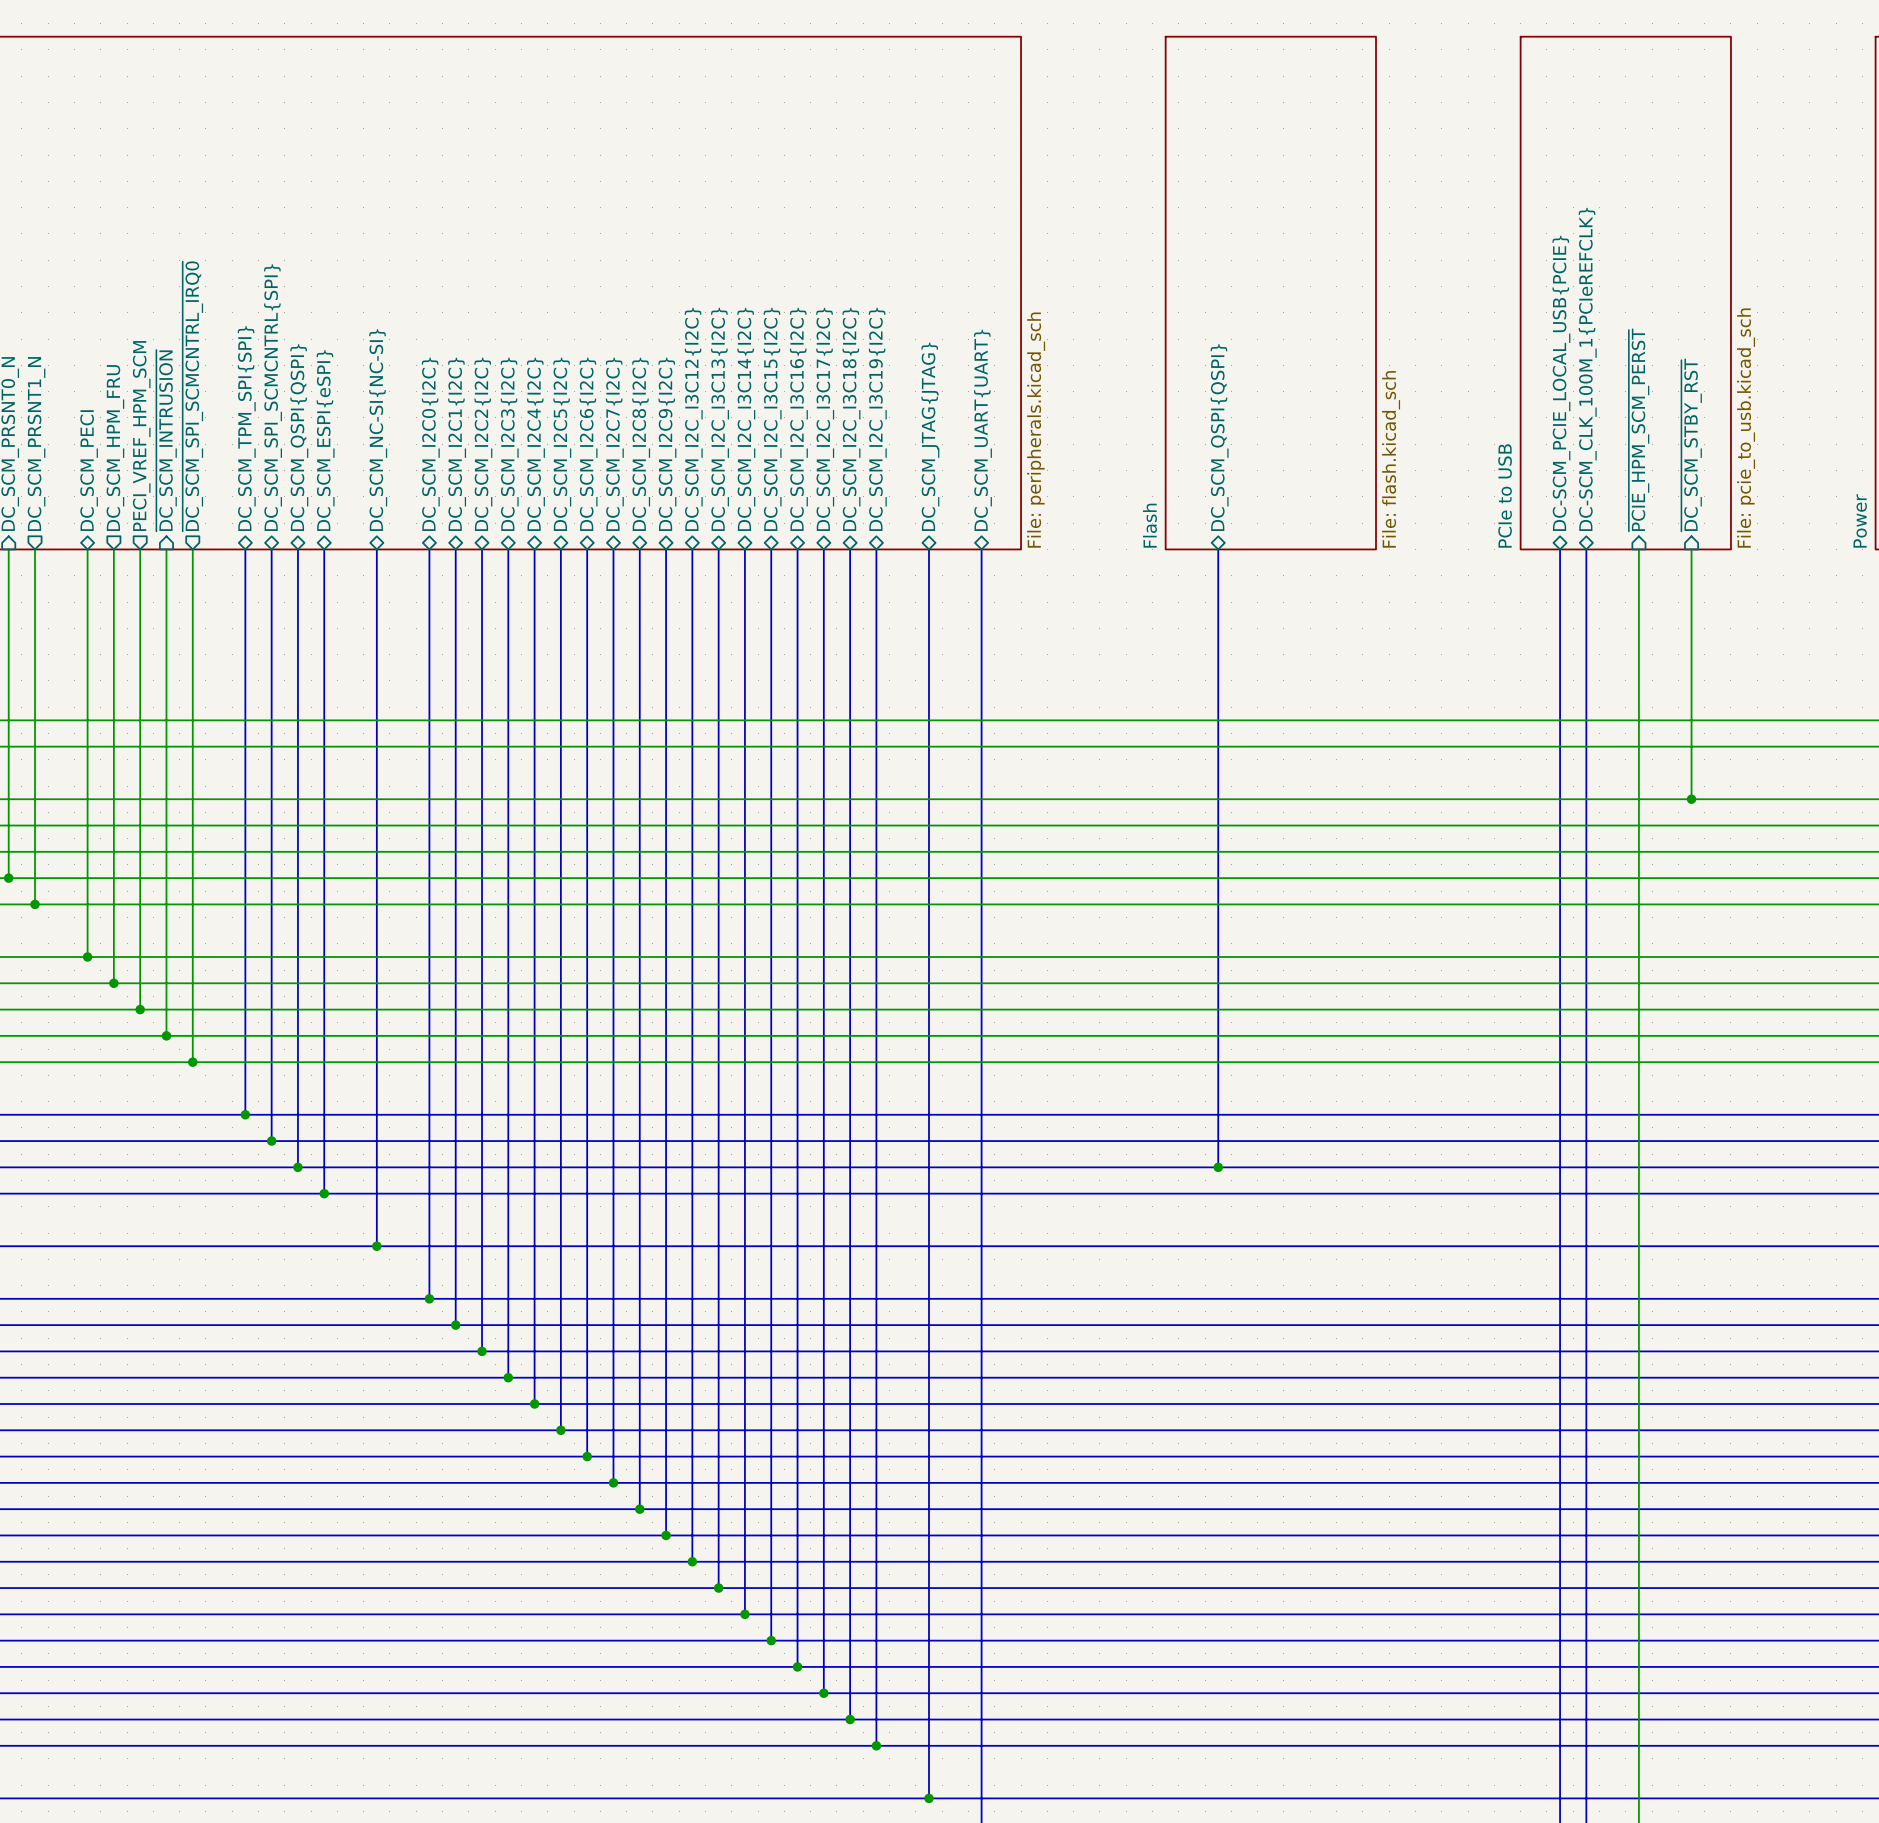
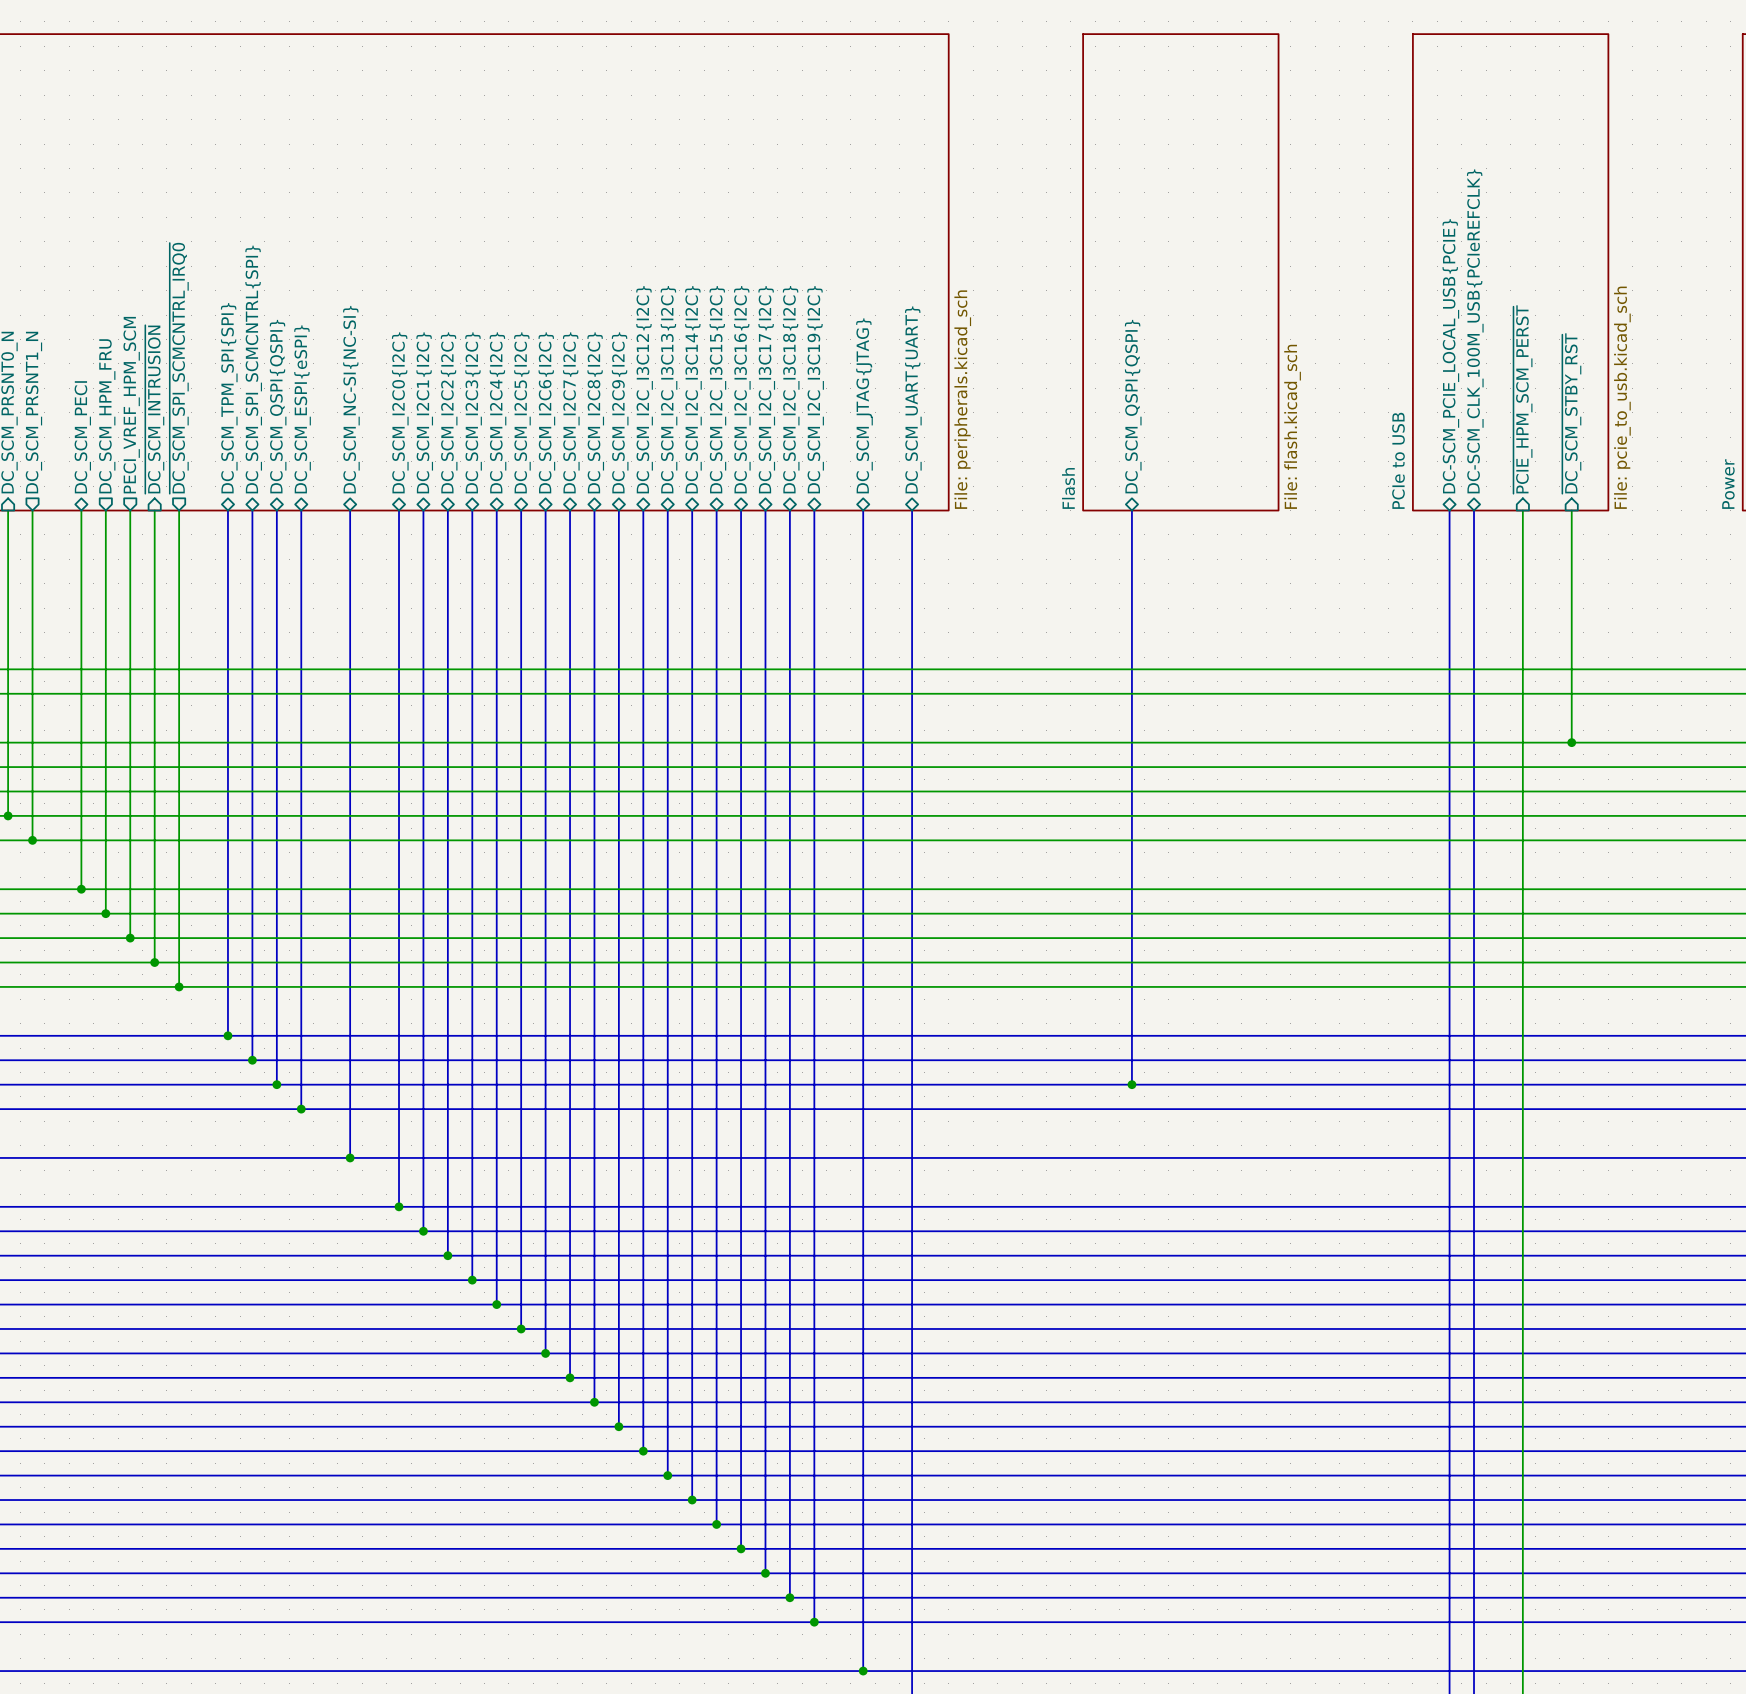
sheet pin: DC-SCM_CLK_100M_1{PCIeREFCLK} (1587, 369) -> DC-SCM_CLK_100M_USB{PCIeREFCLK} (1475, 331)

